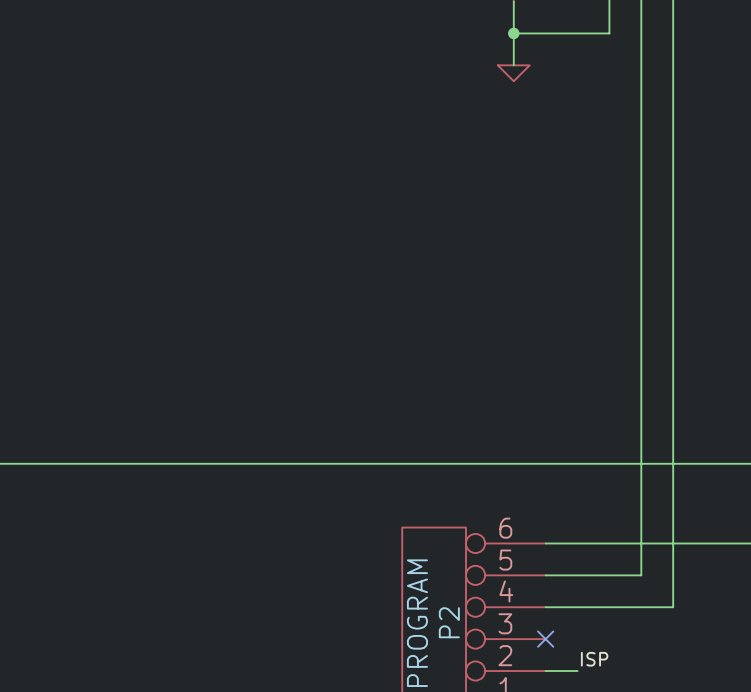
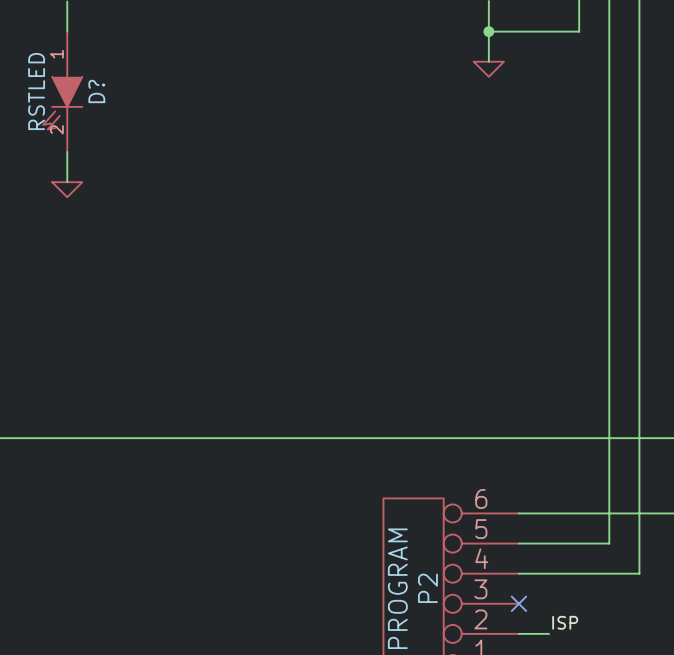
wire: none -> (67, 1) (67, 31)
D?: none -> RSTLED (62, 91)
wire: none -> (67, 152) (67, 182)
power symbol: none -> (67, 189)

